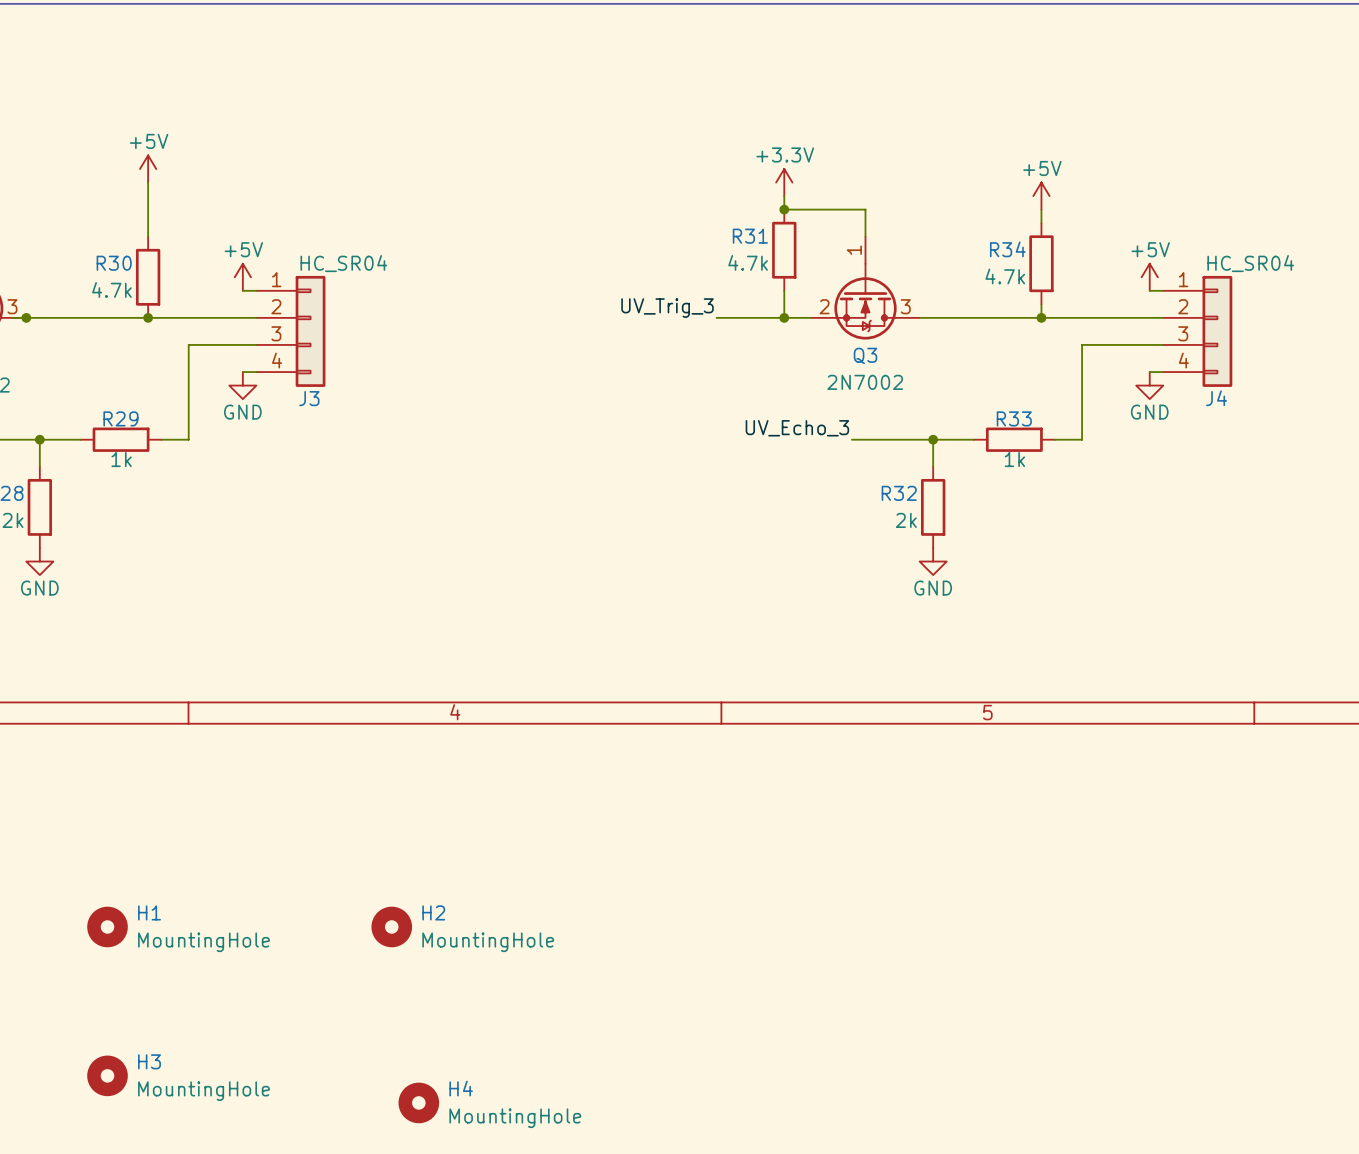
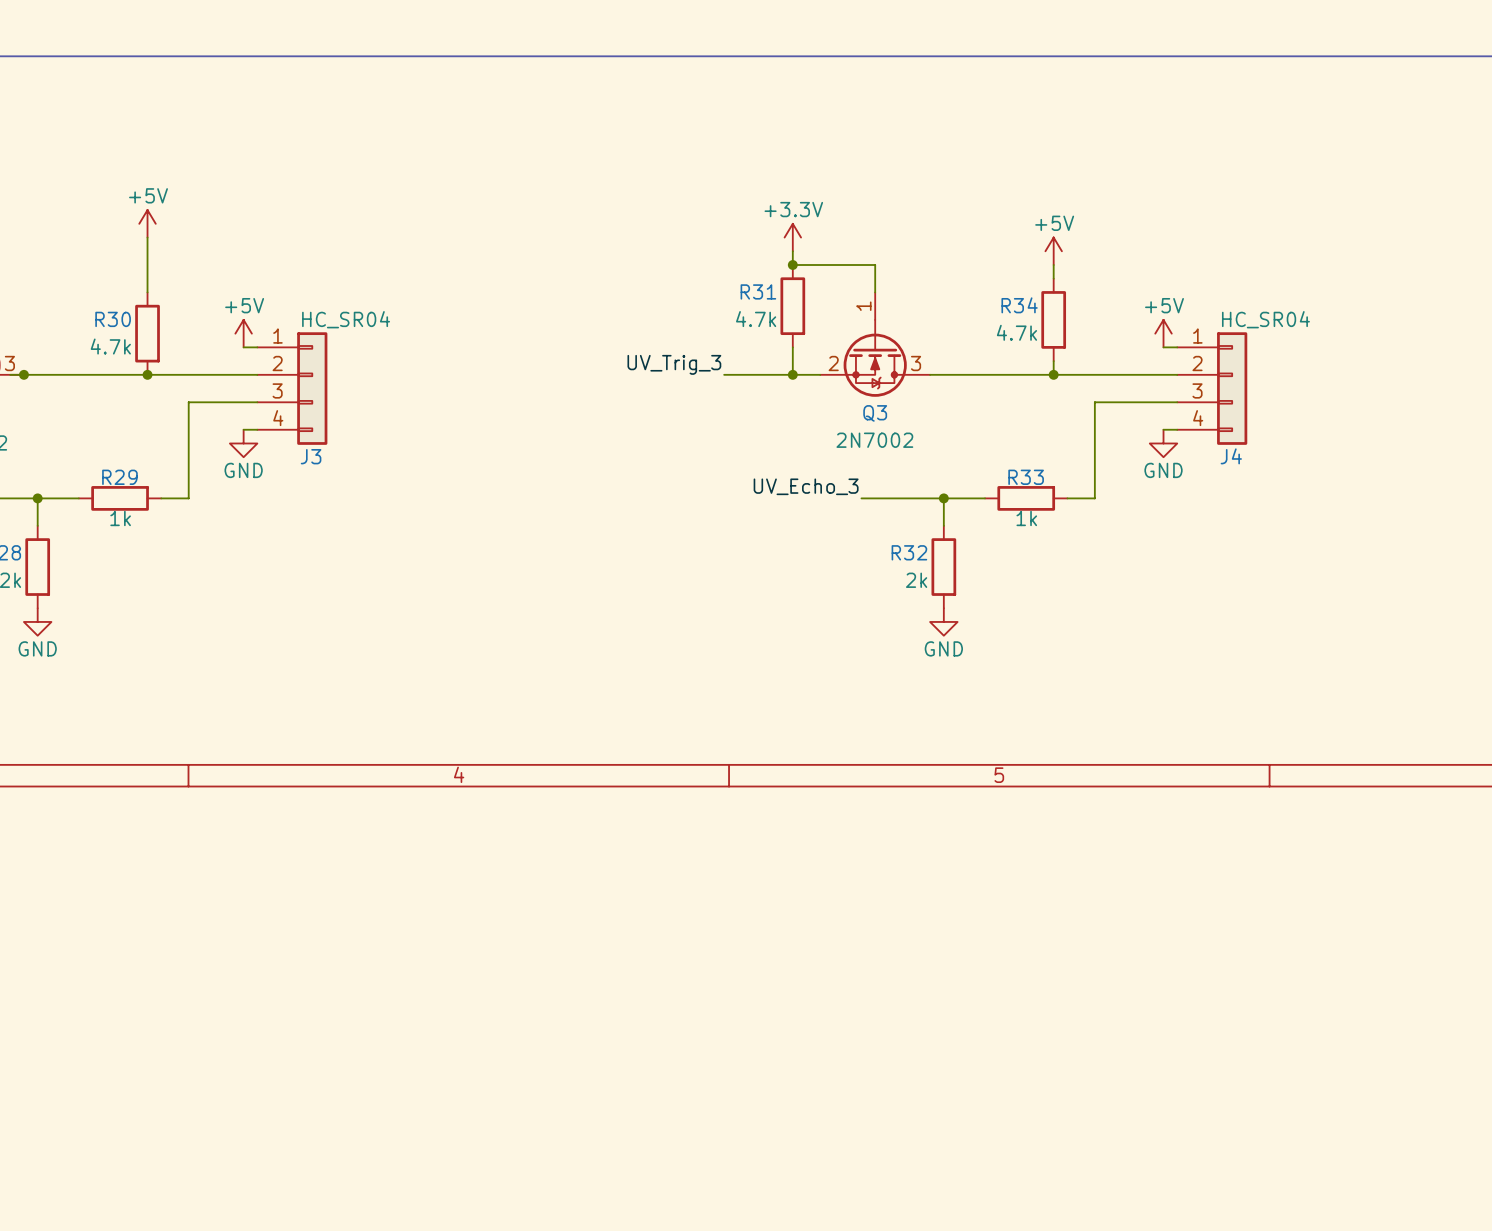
H1: MountingHole (107, 926) -> none
H2: MountingHole (391, 926) -> none
H3: MountingHole (107, 1075) -> none
H4: MountingHole (418, 1102) -> none

